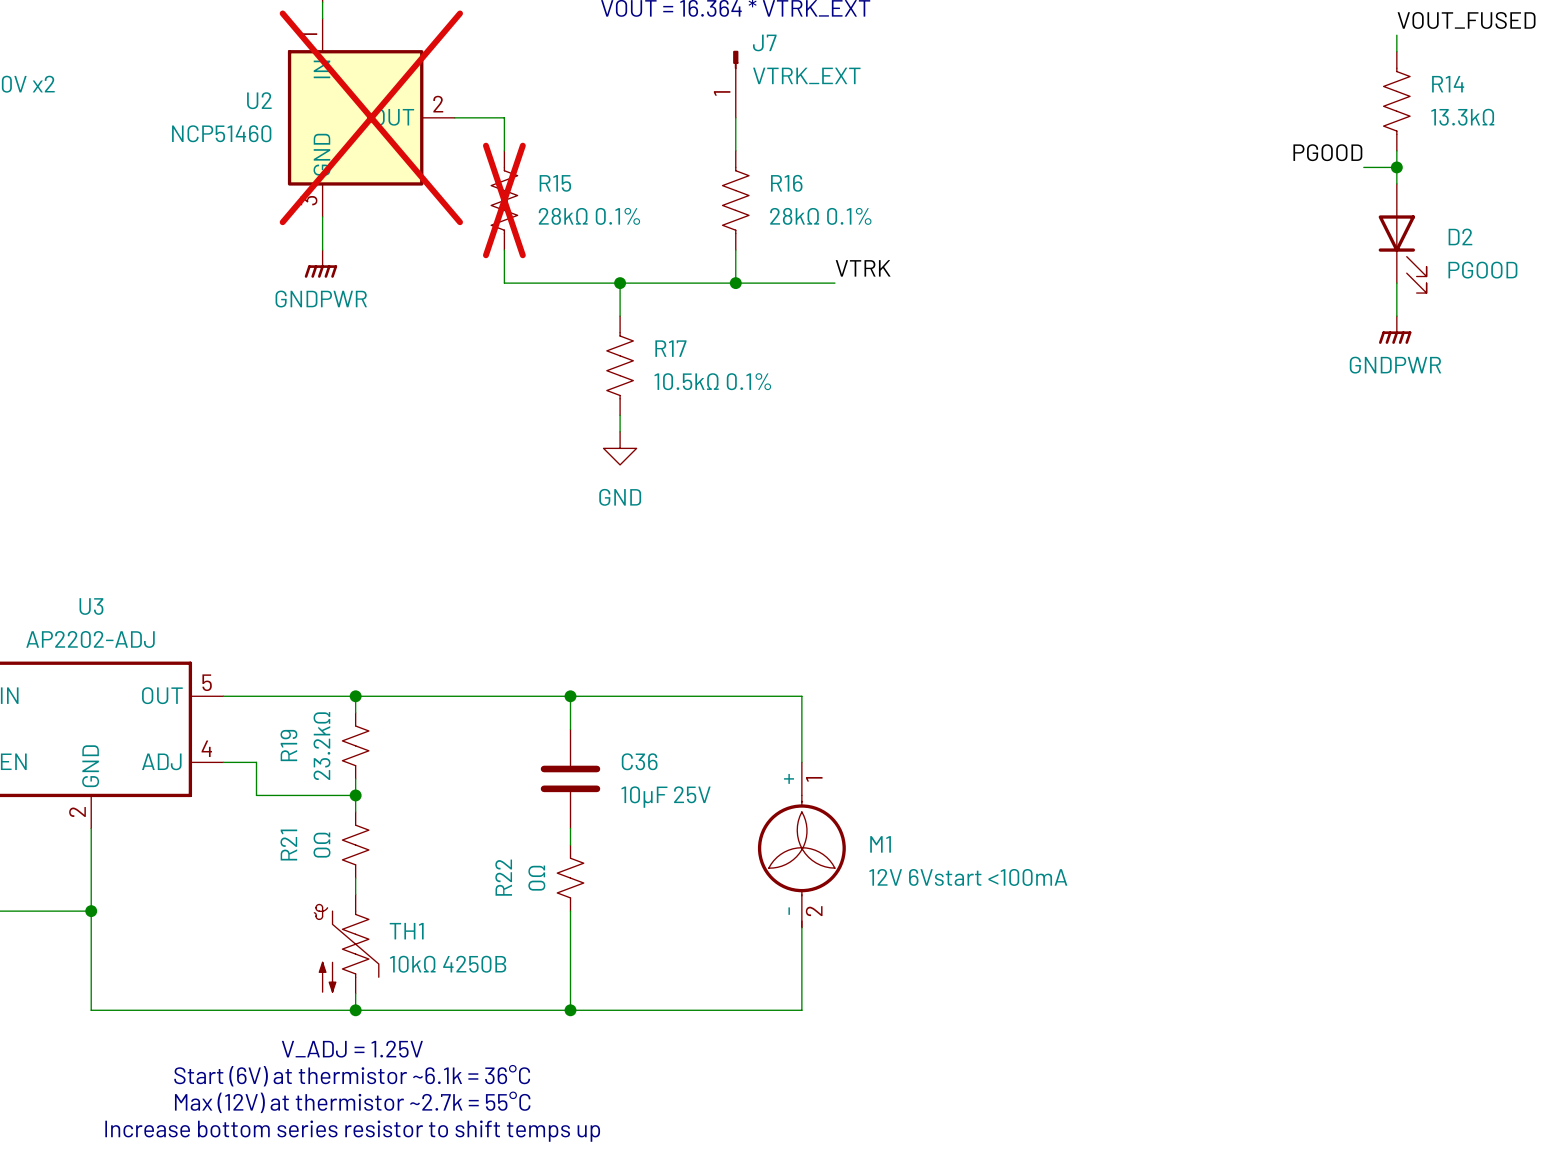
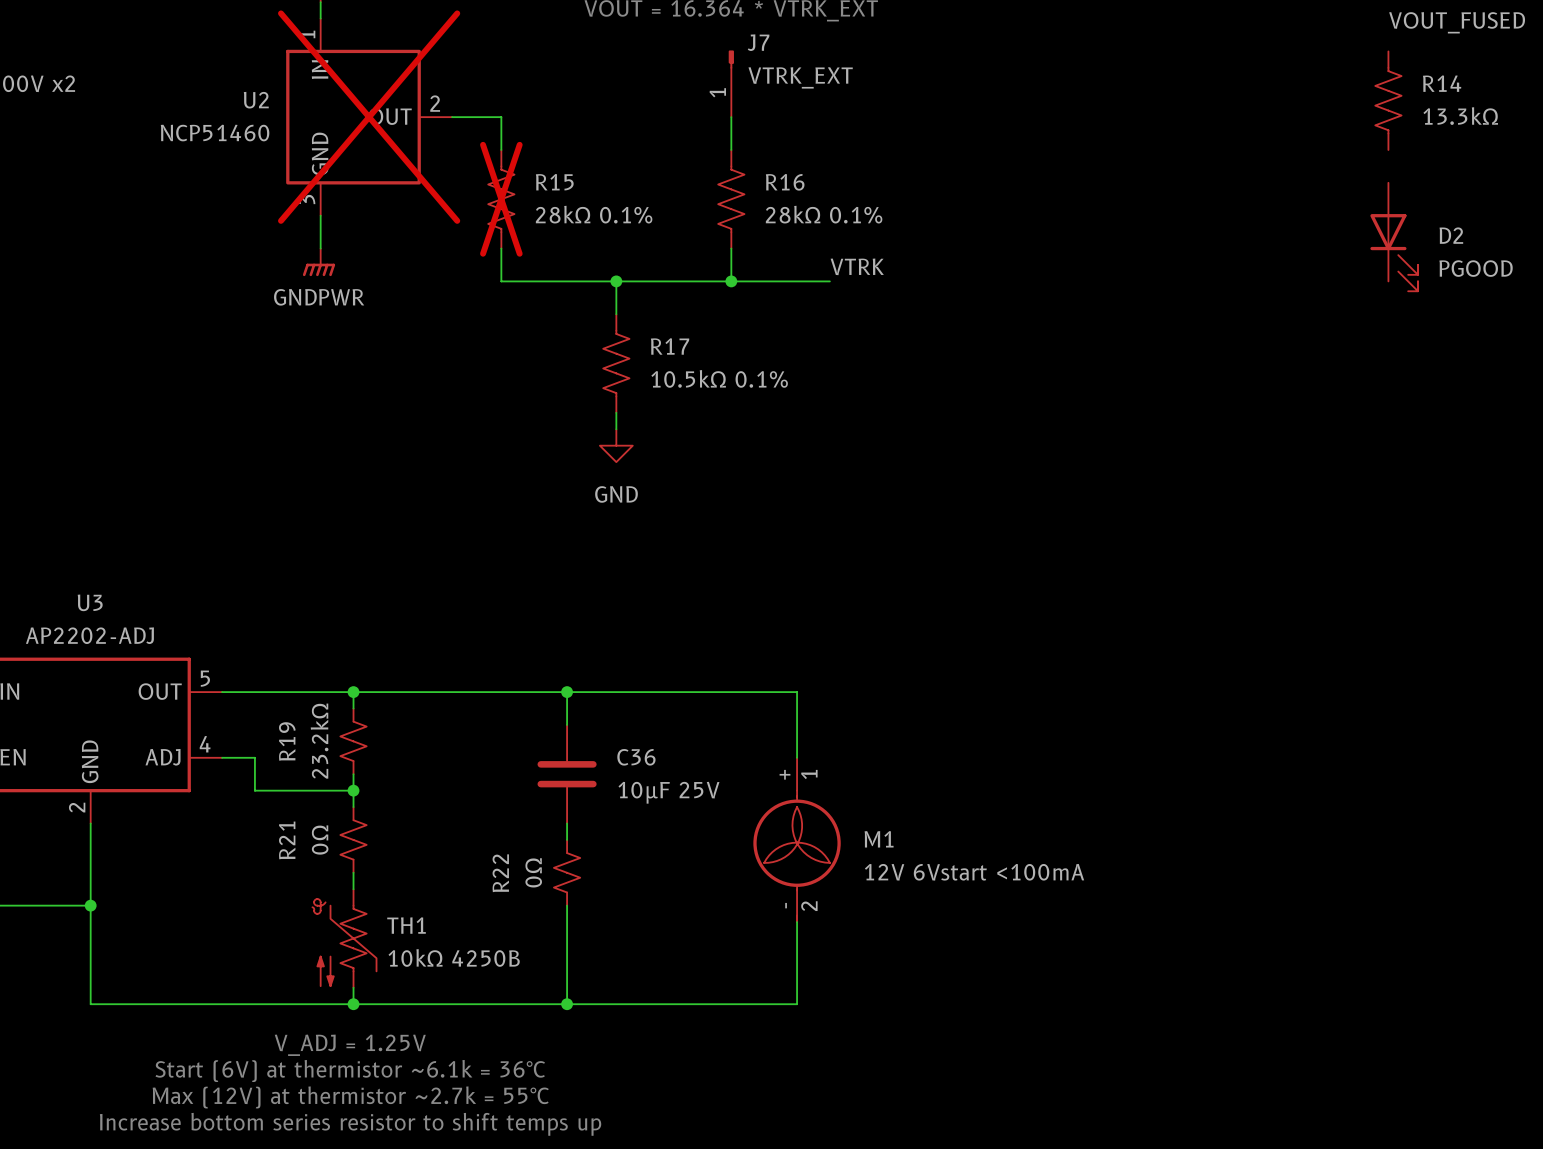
wire: (1396, 35) (1396, 51) -> none
wire: (1396, 150) (1396, 183) -> none
label: PGOOD (1327, 152) -> none
wire: (1363, 167) (1396, 167) -> none
junction: (1396, 167) -> none
wire: (1396, 283) (1396, 316) -> none
power symbol: GNDPWR (1395, 330) -> none

